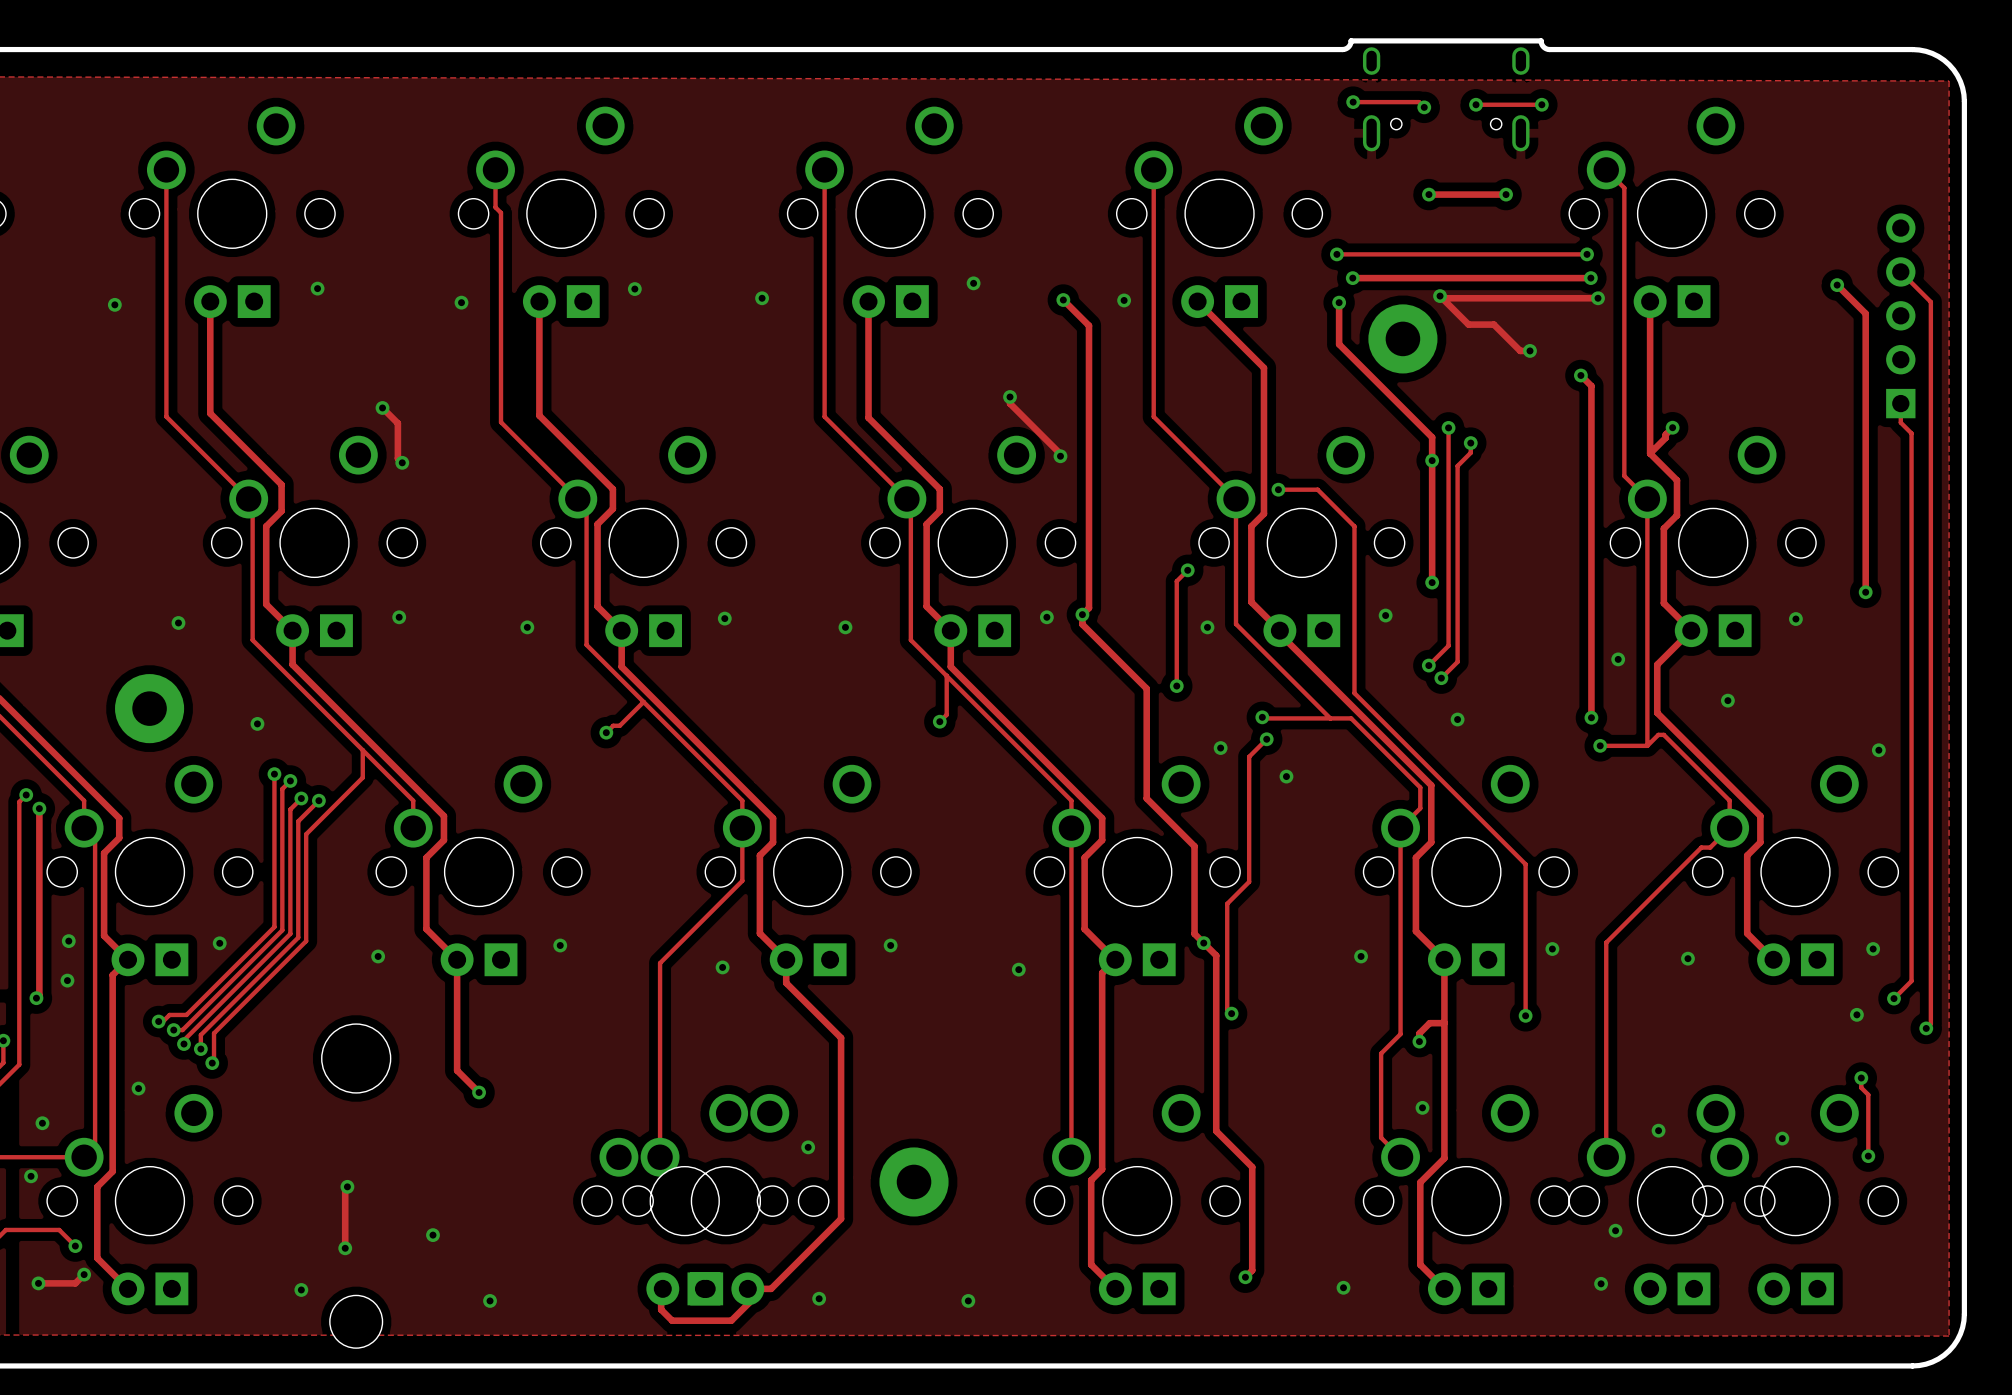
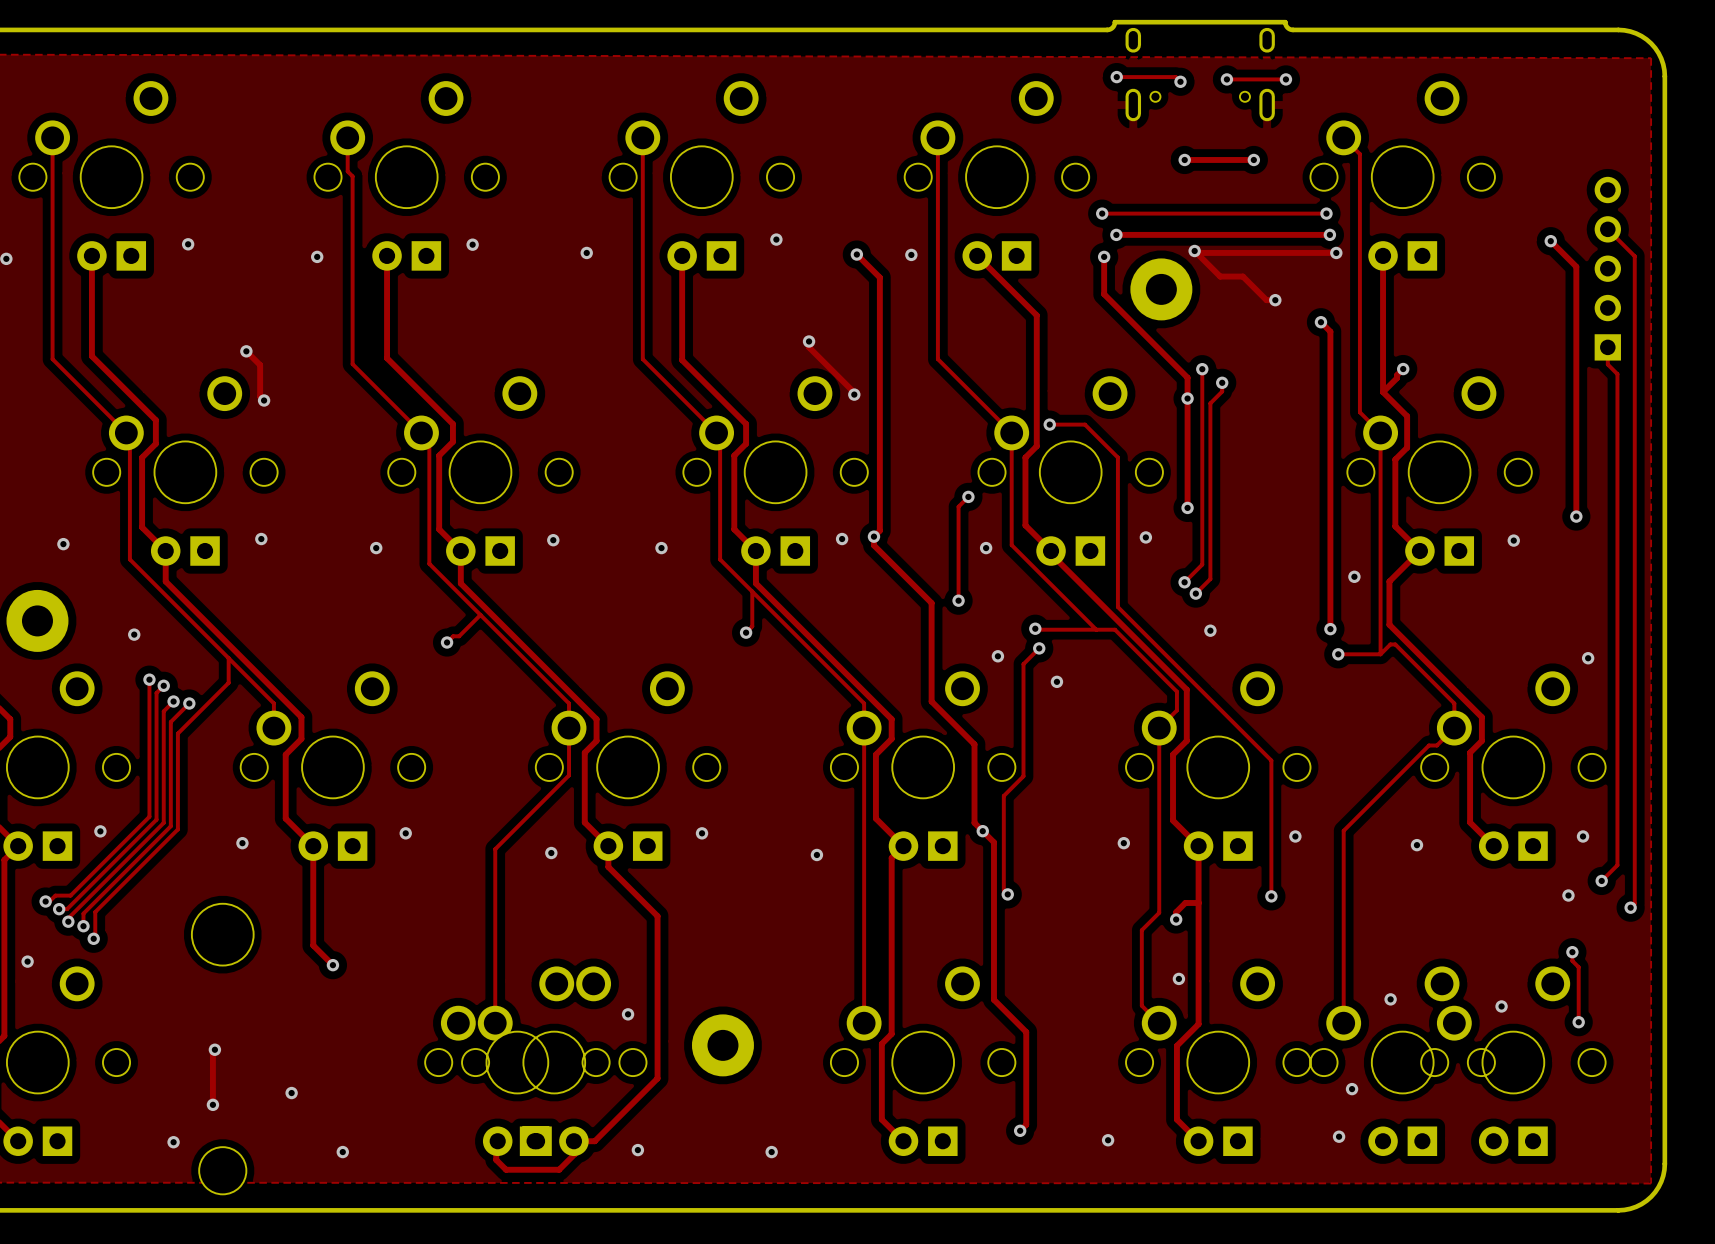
via: (1727, 700) -> none

